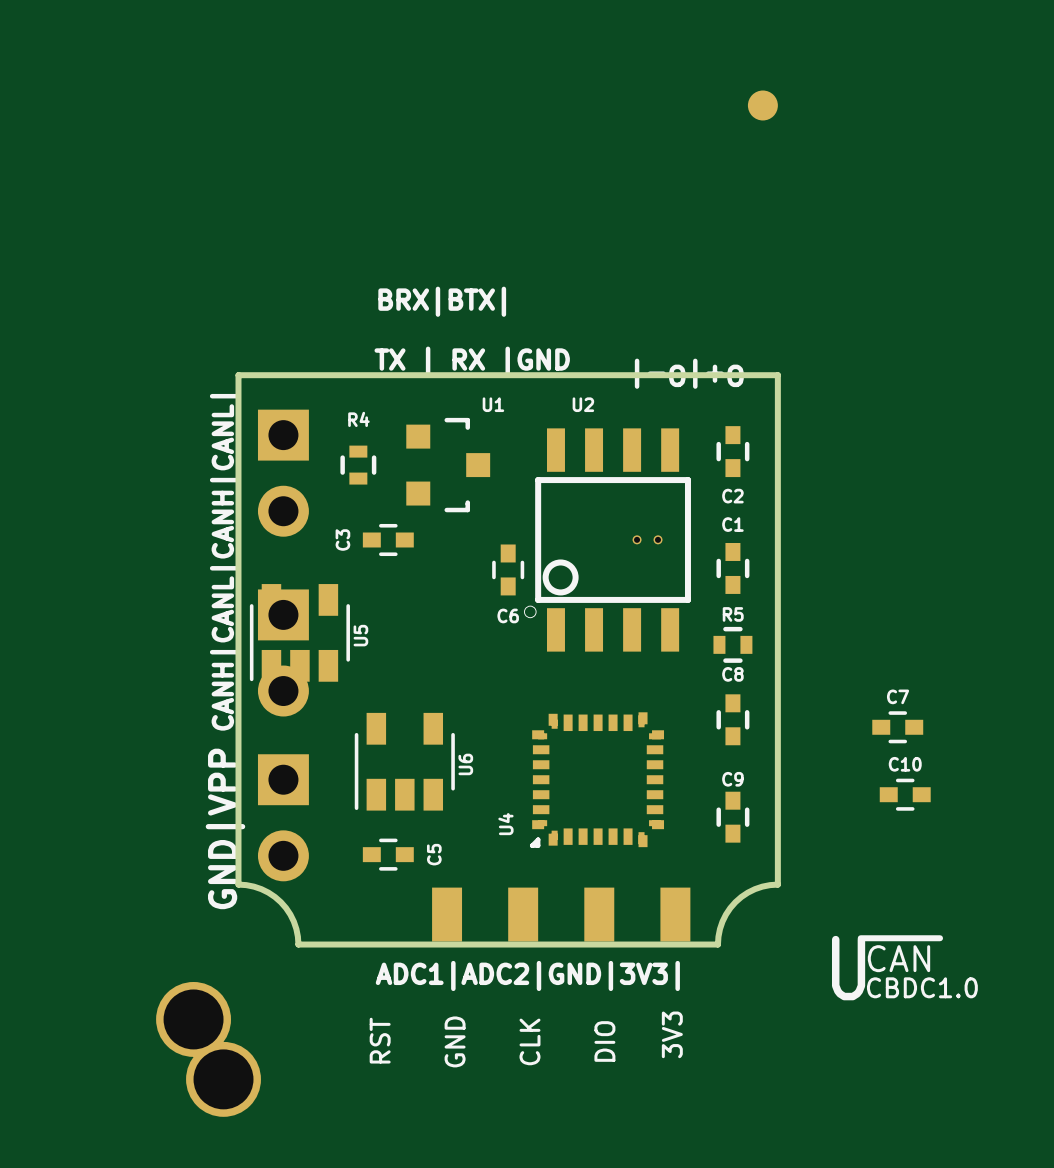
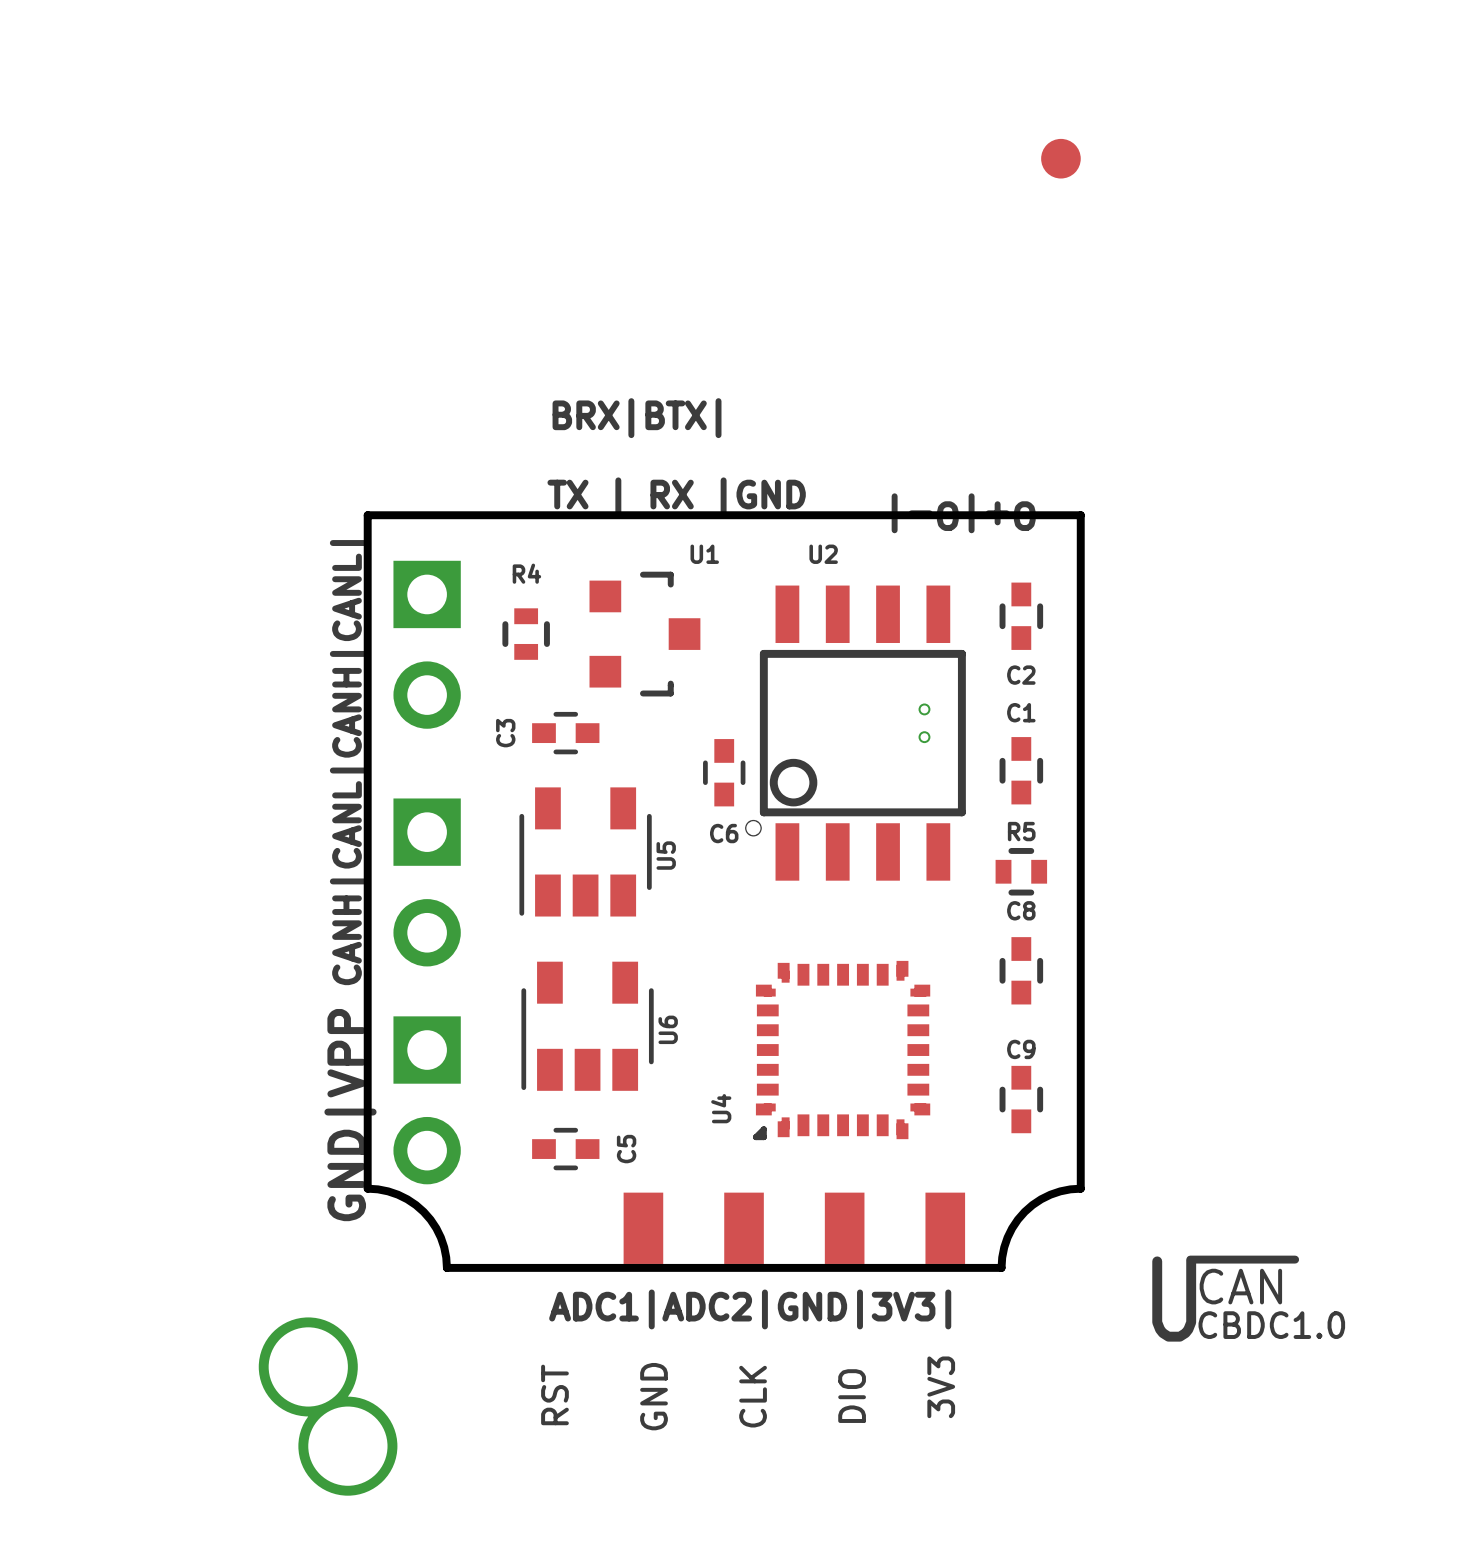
part rotation: 0° (647, 539) -> 90° clockwise (924, 723)
U5 position: (299, 632) -> (585, 851)
C7: (897, 727) -> none
C10: (905, 794) -> none

